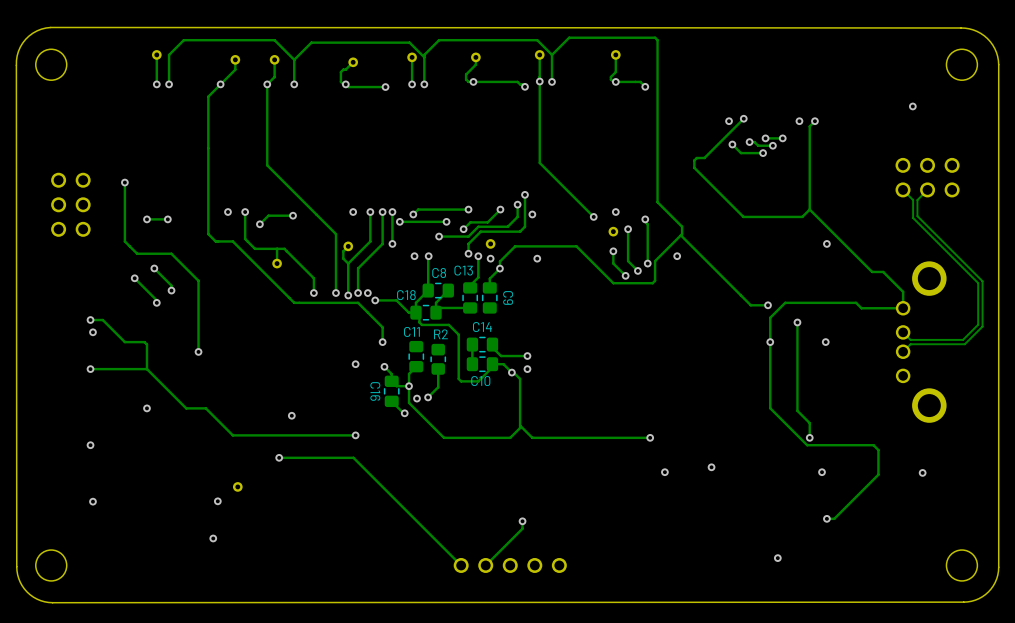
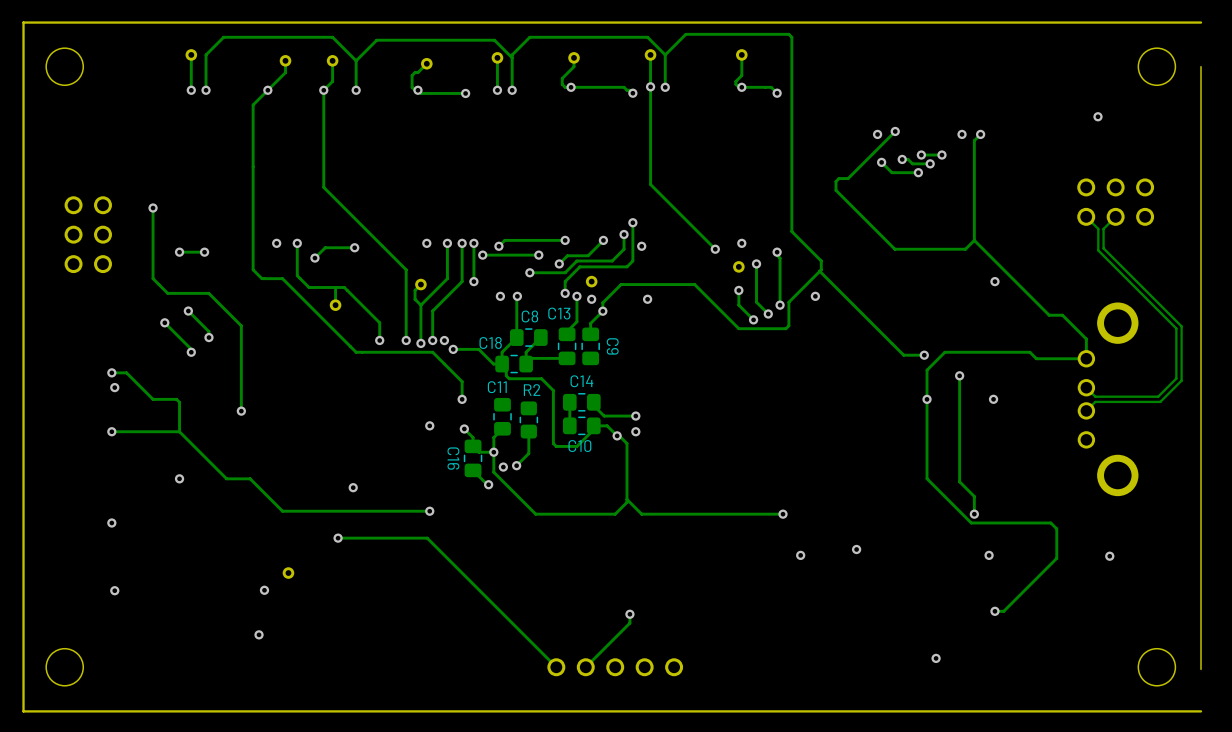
board edge: none -> (1201, 22) (23, 22) (23, 711) (1201, 711)
board edge: (998, 64) (996, 52) (987, 38) (973, 29) (960, 28) (50, 27) (37, 30) (25, 39) (18, 51) (16, 65) (16, 566) (22, 585) (37, 599) (52, 602) (963, 602) (975, 600) (988, 591) (995, 582) (998, 567) -> none

